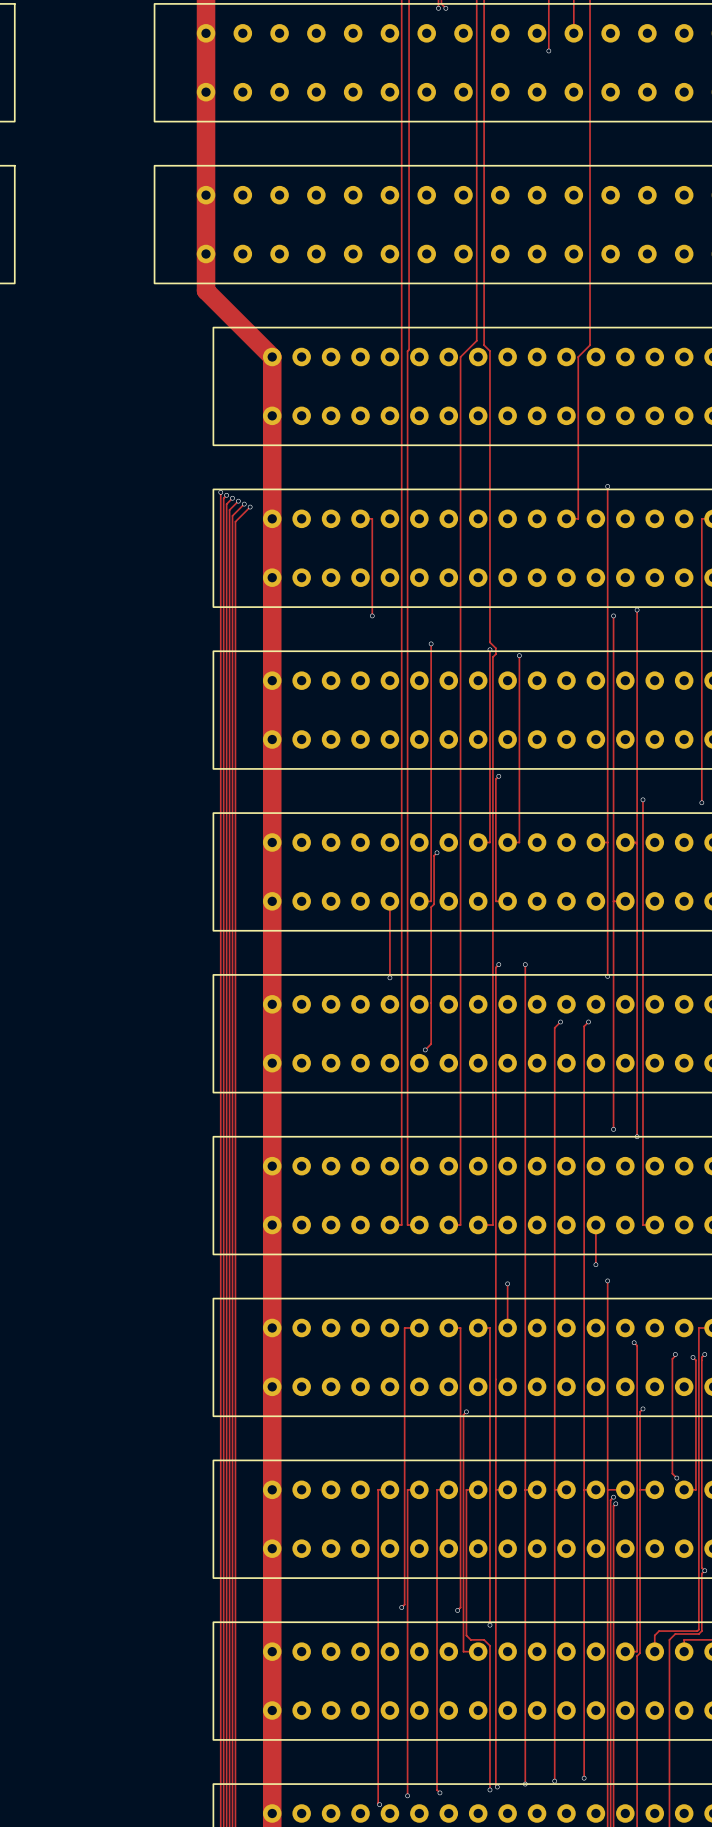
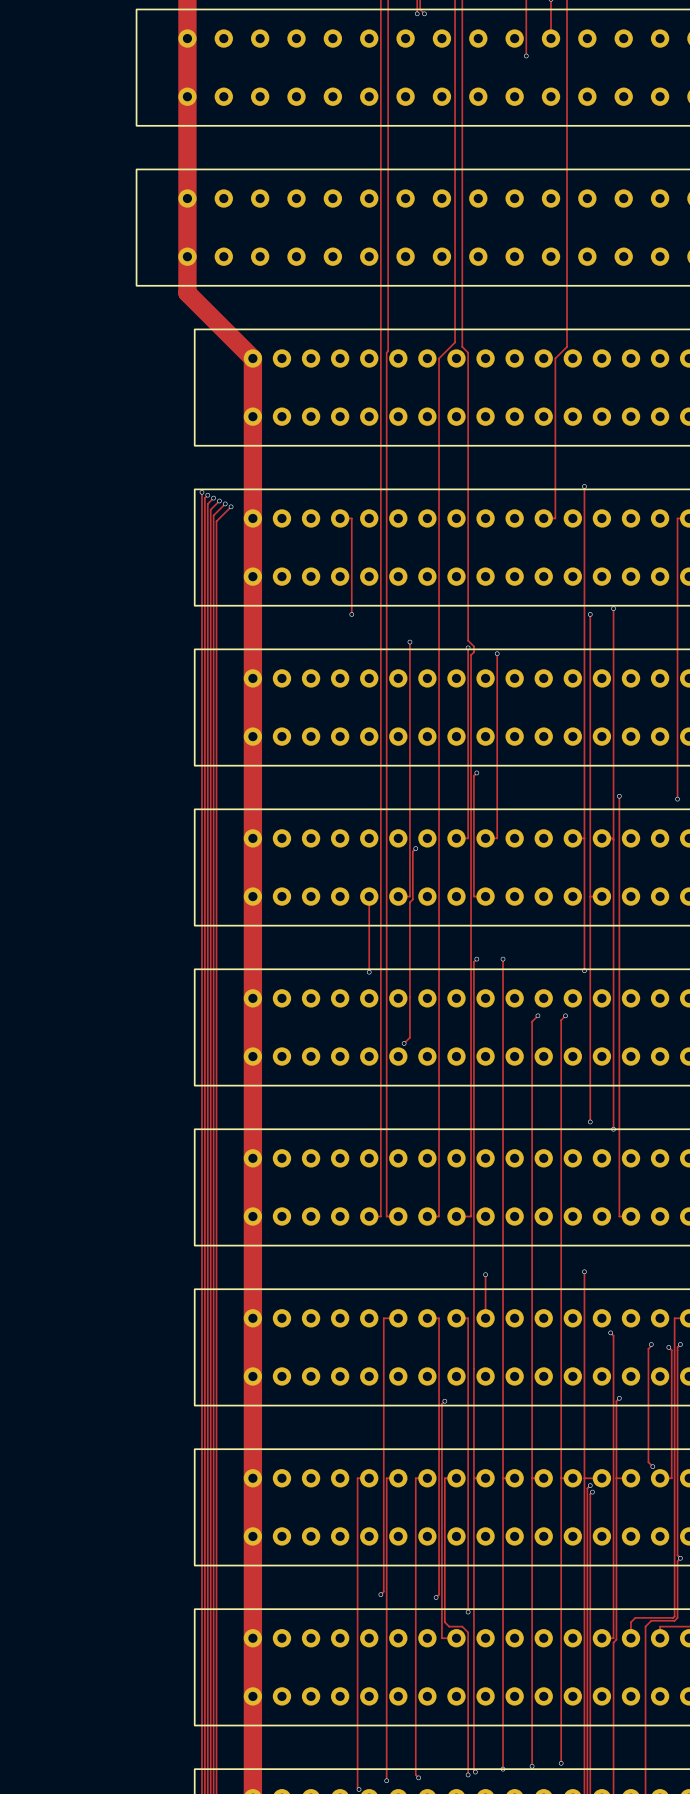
track: (595, 1225) (595, 1264) -> none
via: (595, 1264) -> none

